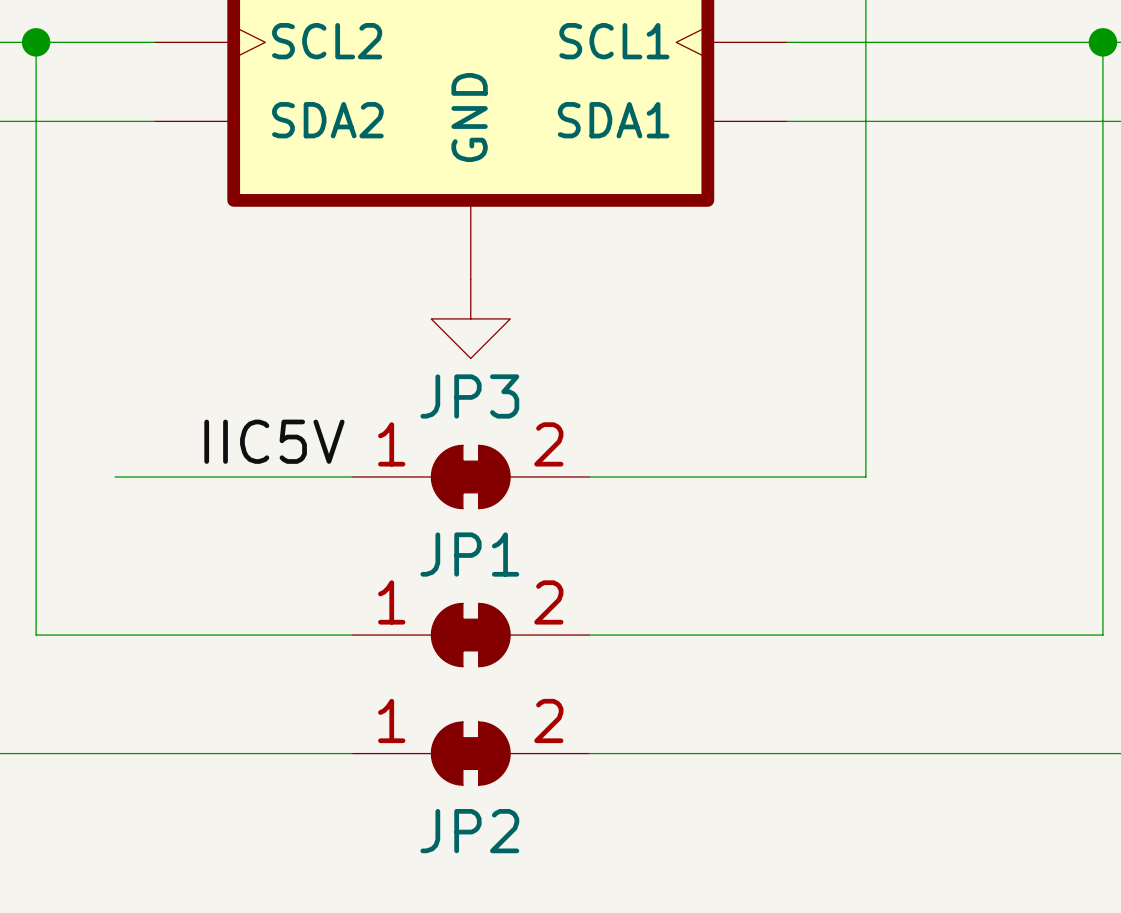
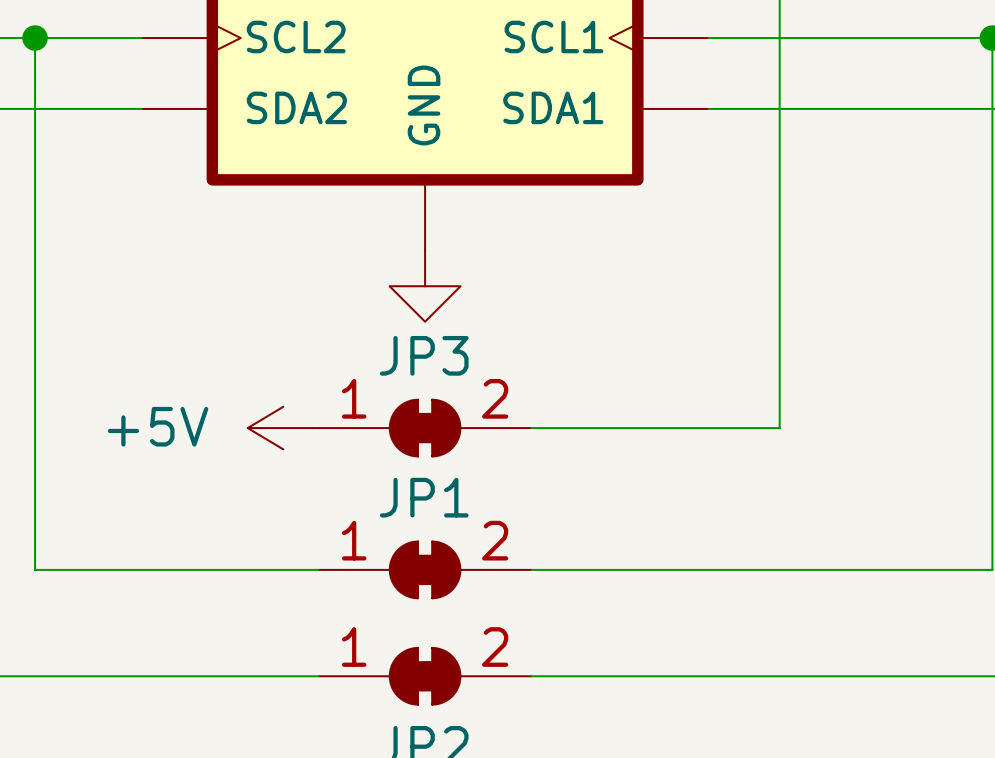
label: IIC5V (274, 441) -> none
wire: (115, 476) (352, 476) -> none
power symbol: none -> +5V (283, 428)

